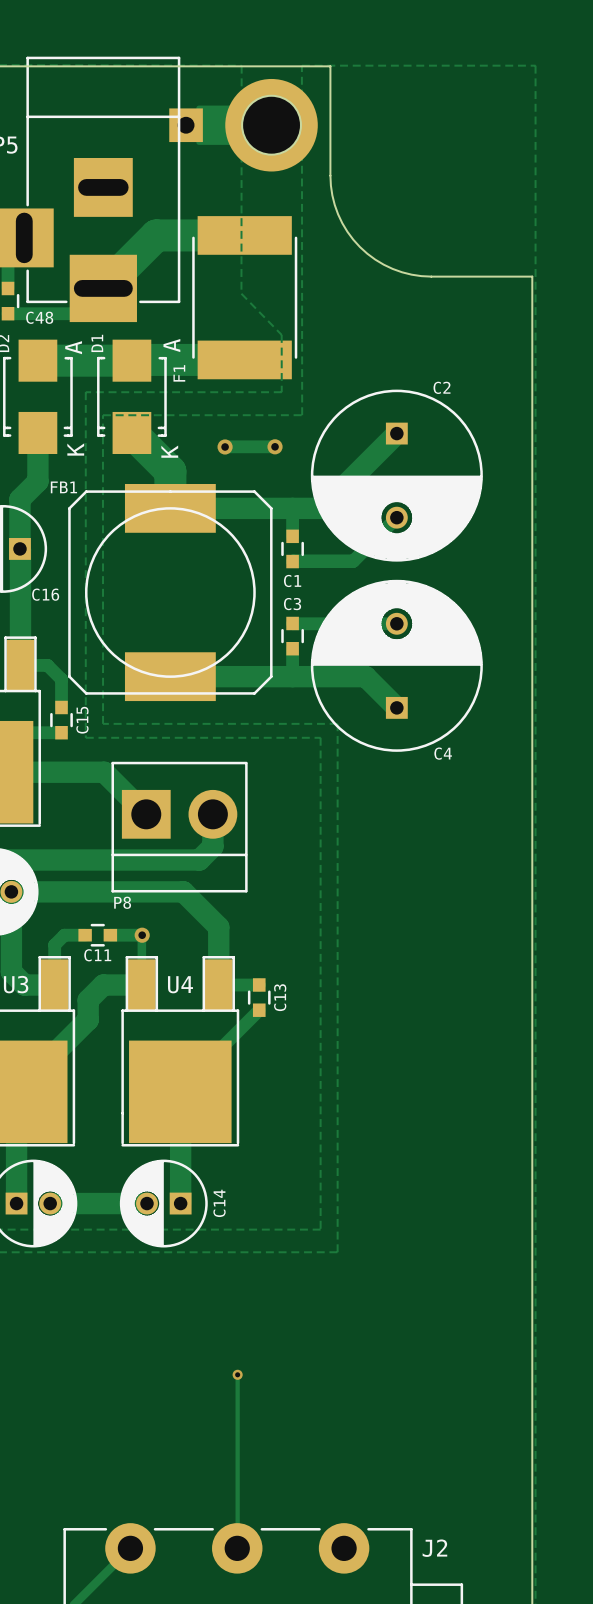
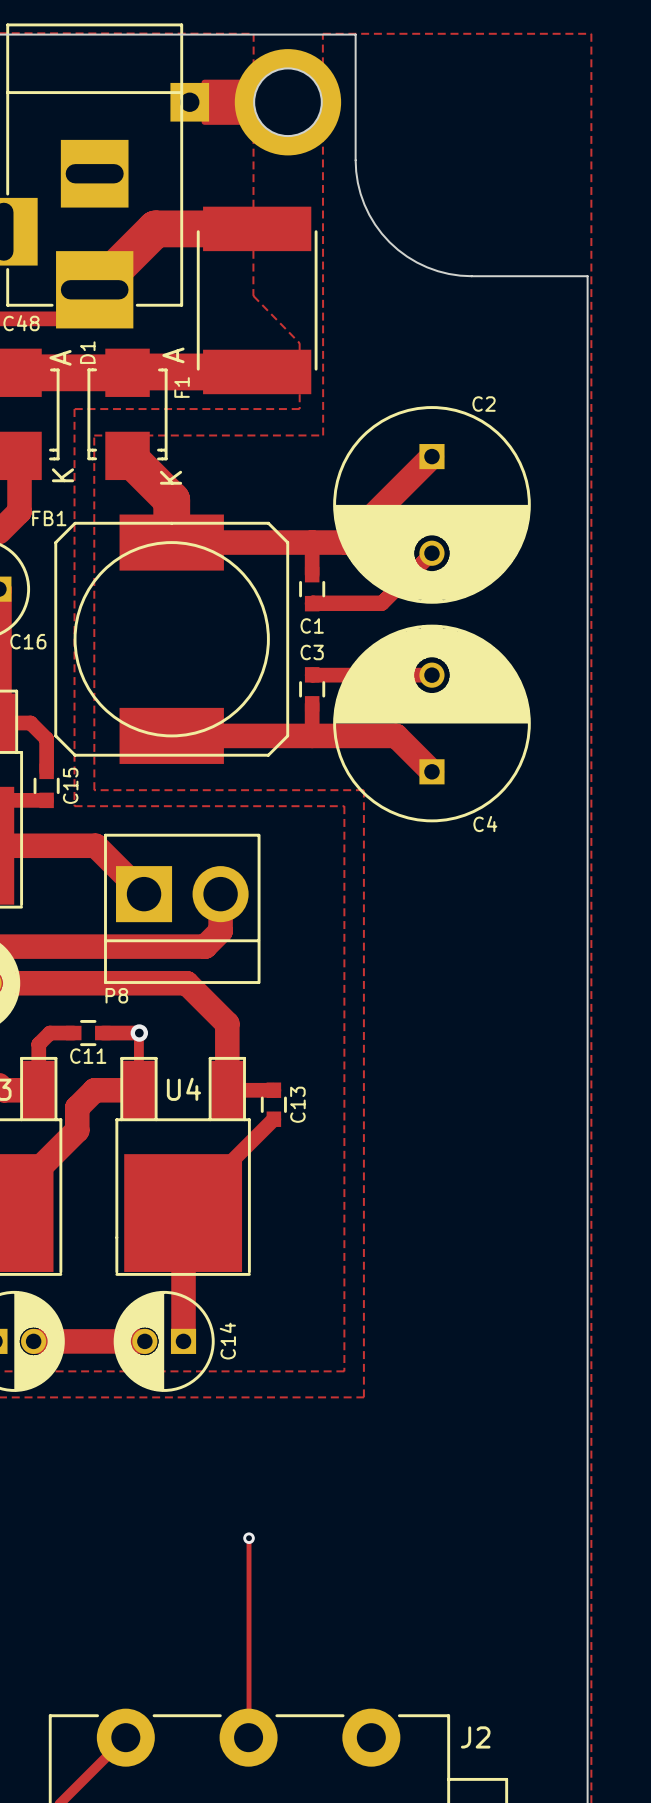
track: (225, 446) (275, 446) -> none
via: (225, 446) -> none
via: (275, 446) -> none

